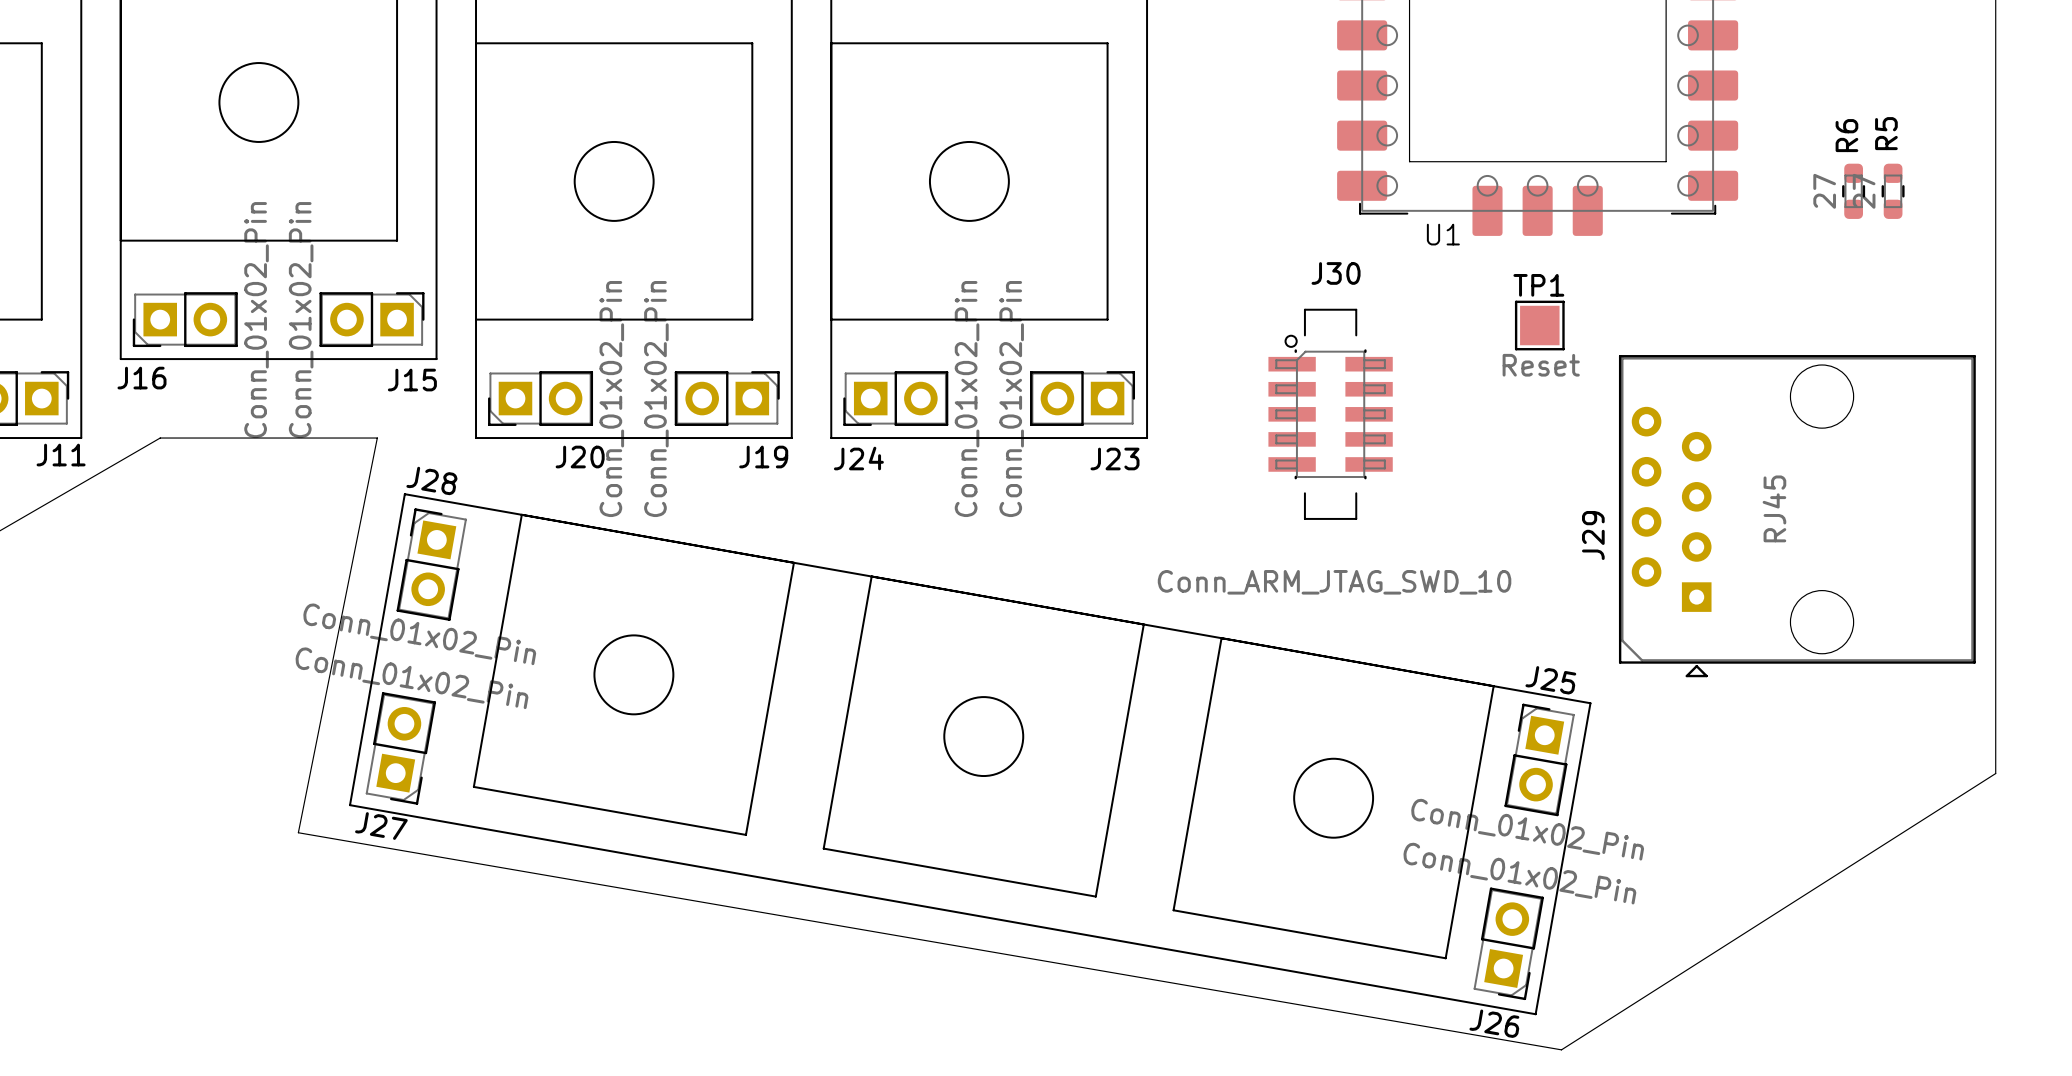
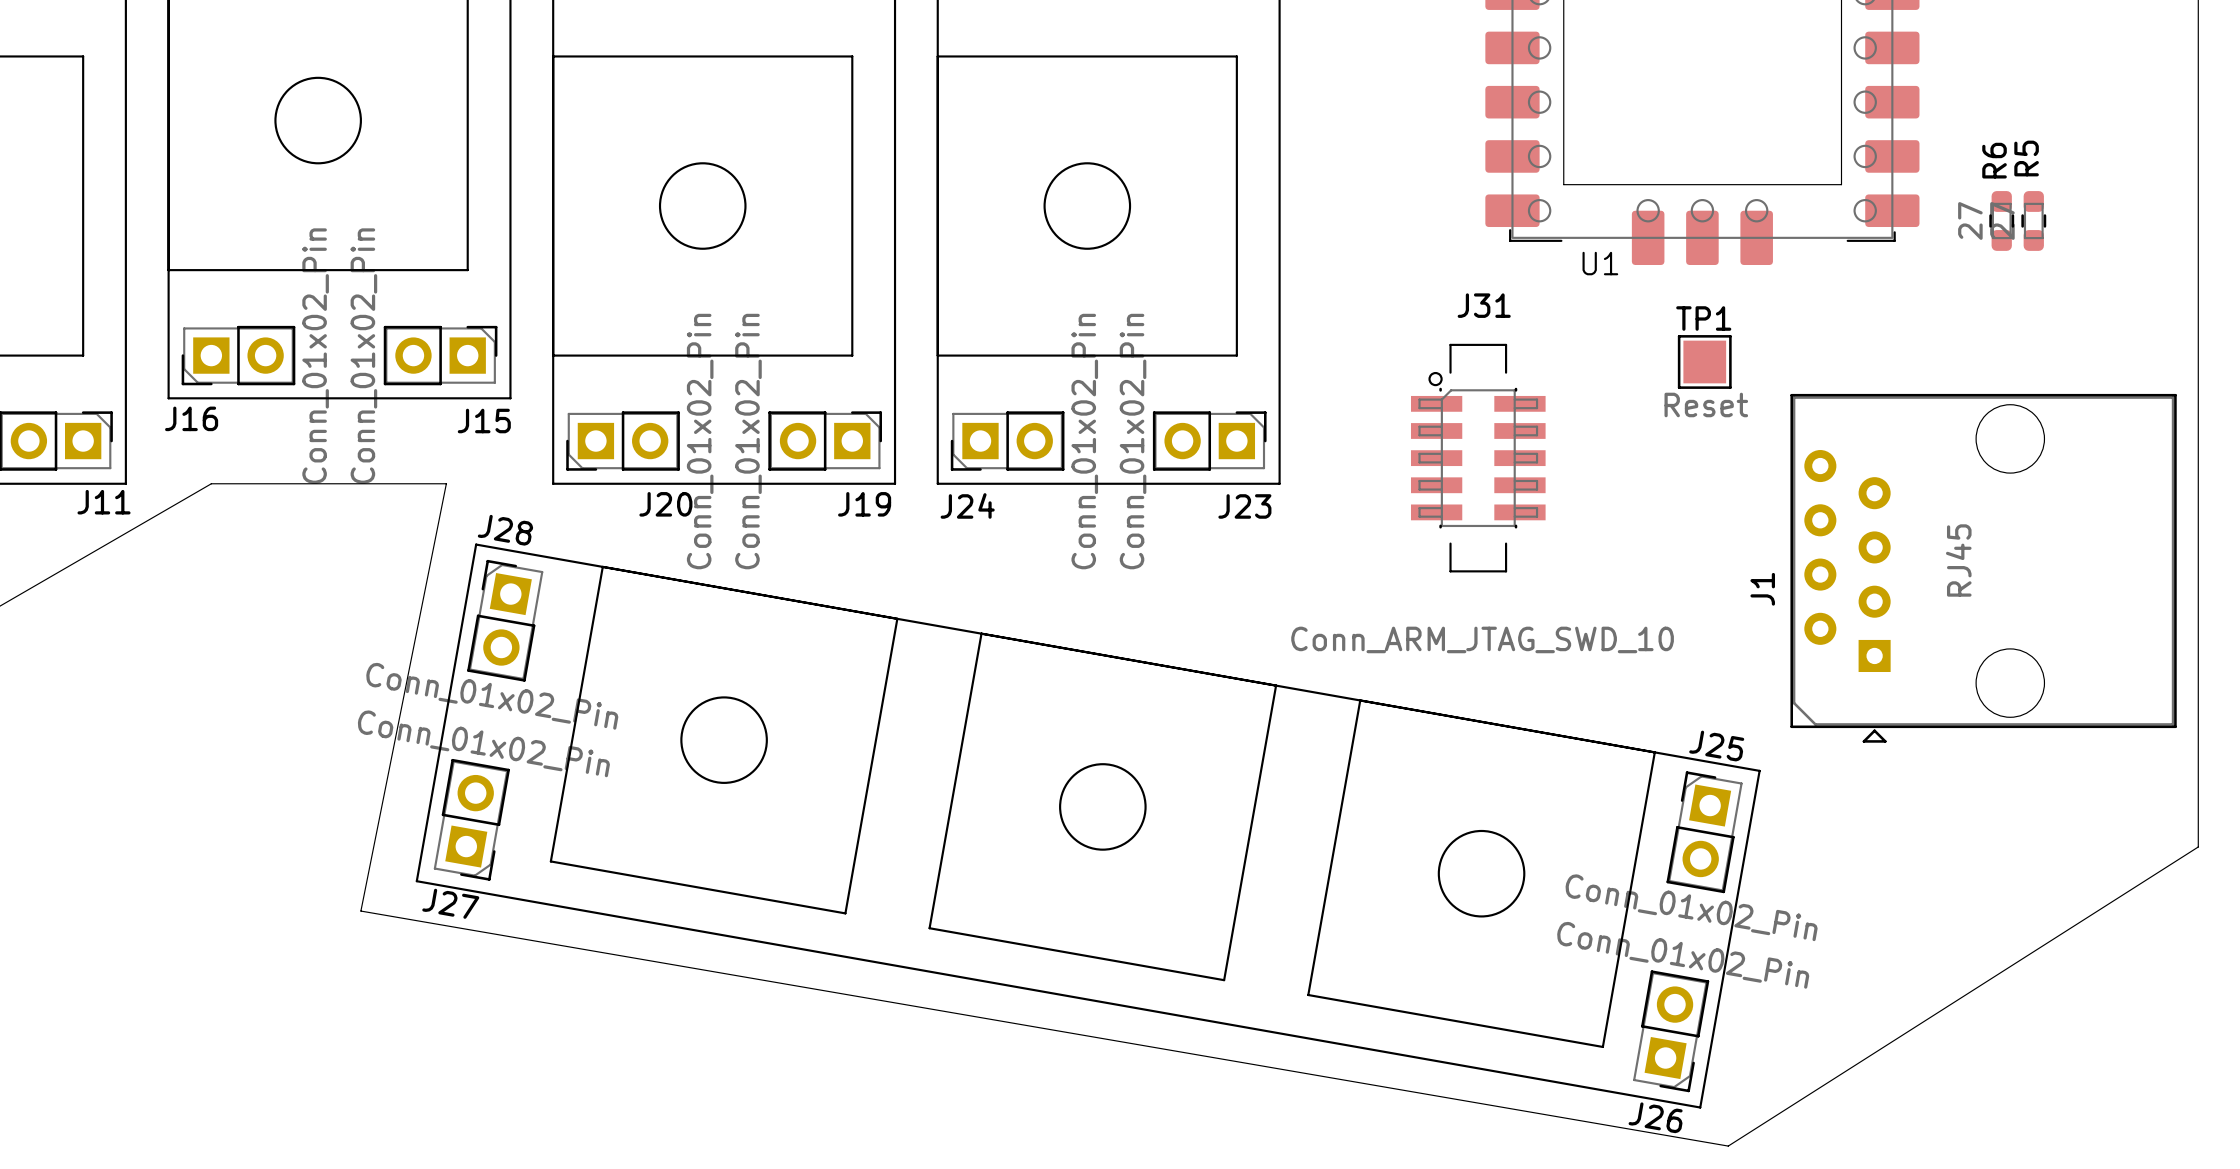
R6 position: (1853, 191) -> (2001, 220)
R5 position: (1893, 191) -> (2033, 220)
J30 name: J30 (1336, 273) -> J31 (1484, 305)
J29 name: J29 (1593, 535) -> J1 (1762, 589)

